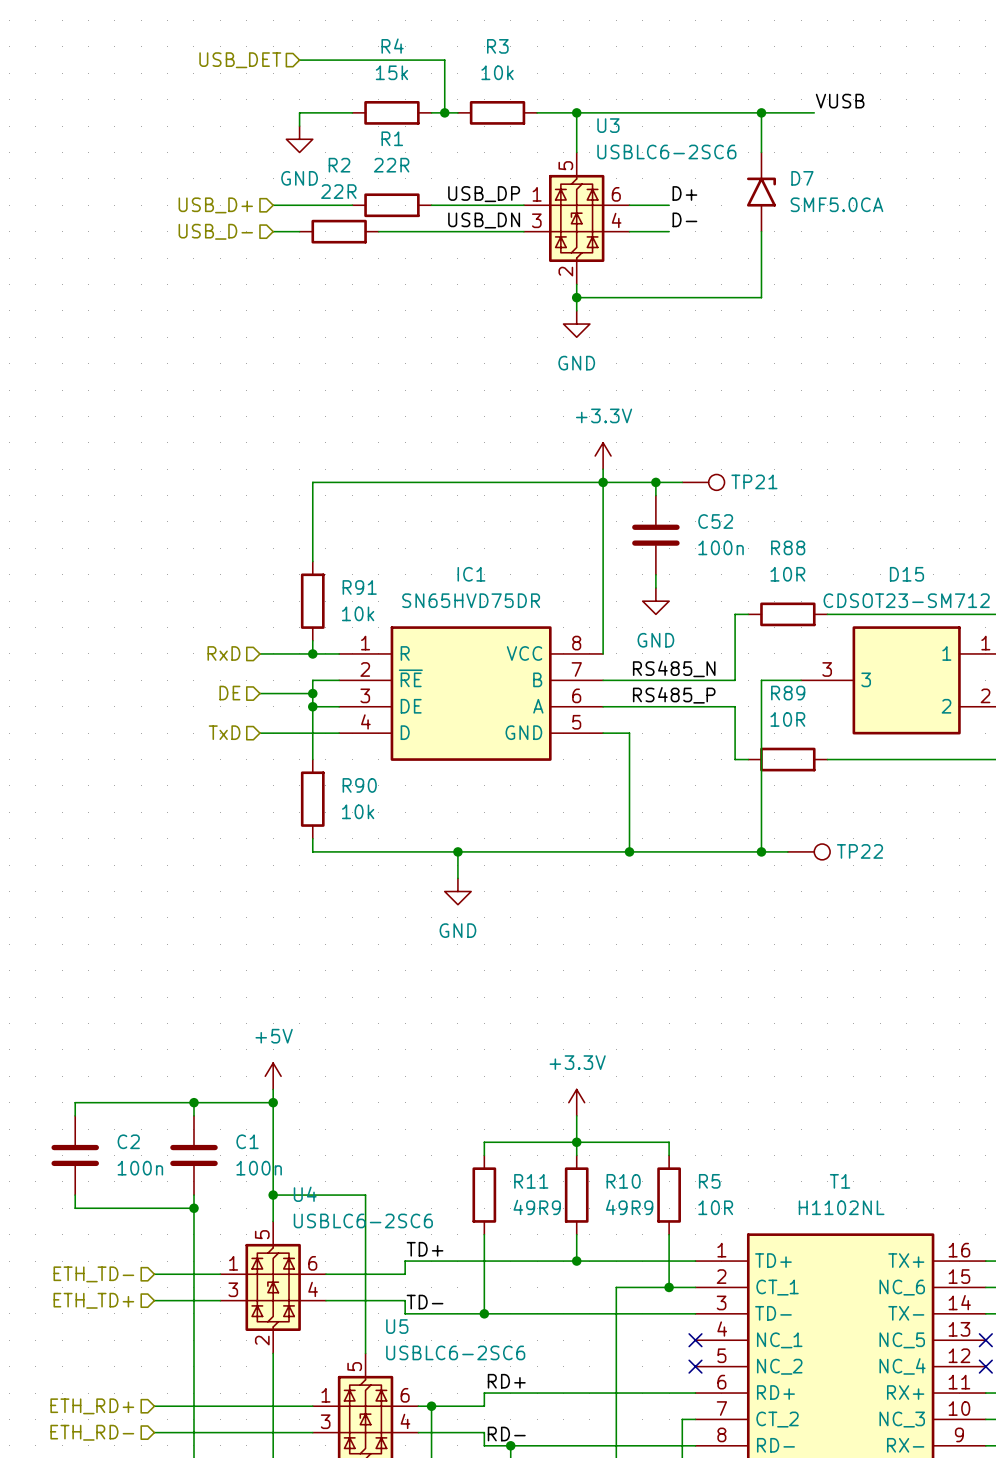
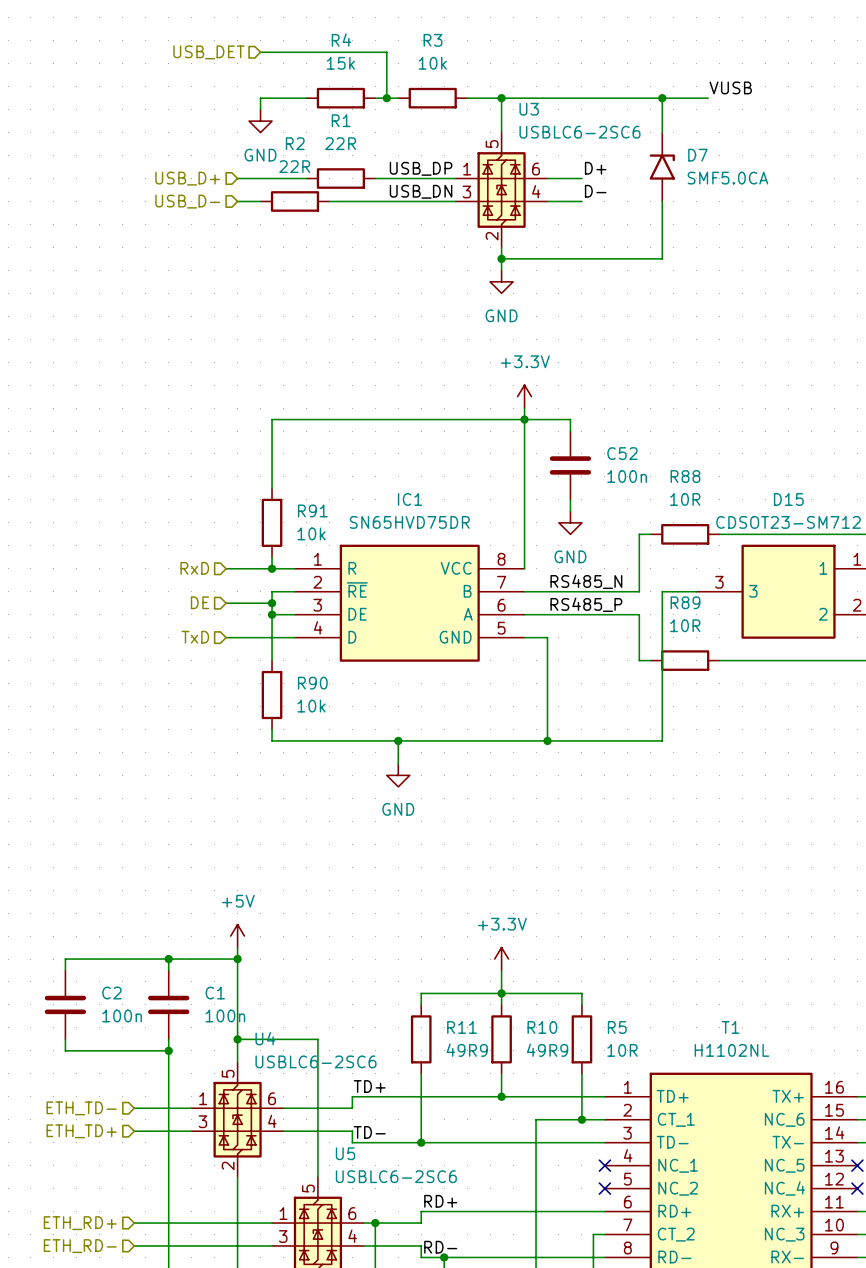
wire: (655, 482) (682, 482) -> none
junction: (655, 482) -> none
TP21: (703, 482) -> none
wire: (761, 851) (787, 851) -> none
junction: (761, 851) -> none
TP22: (808, 851) -> none

